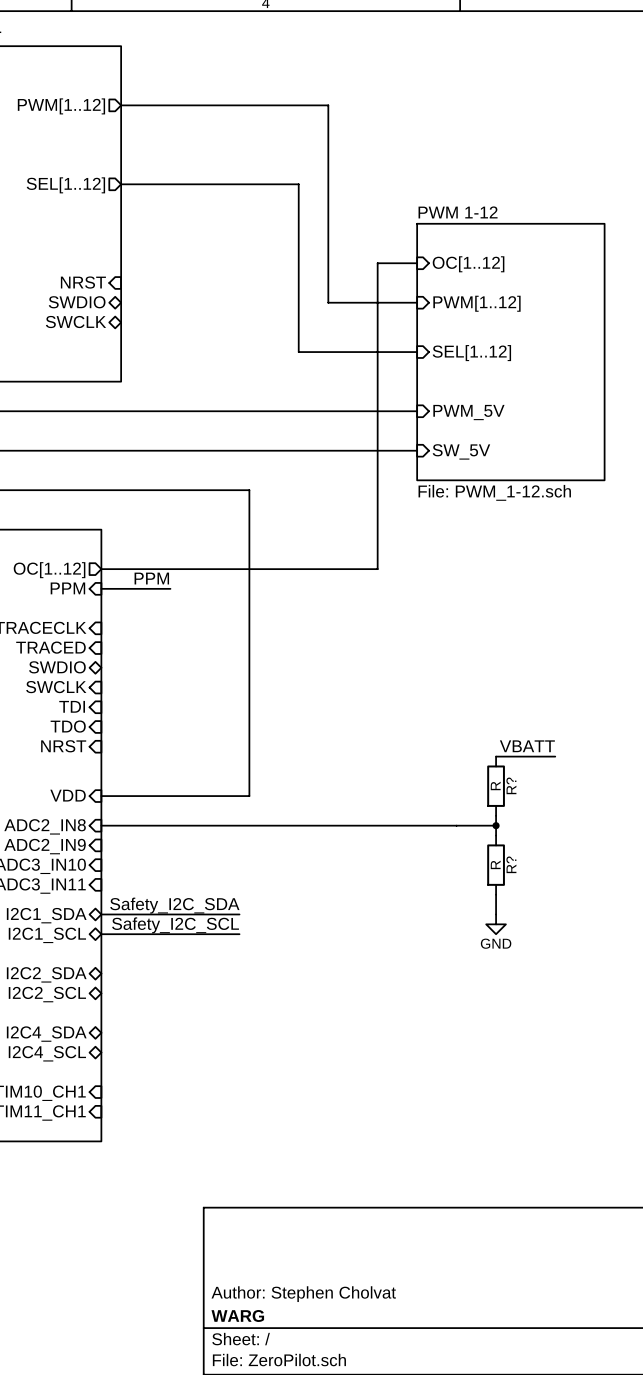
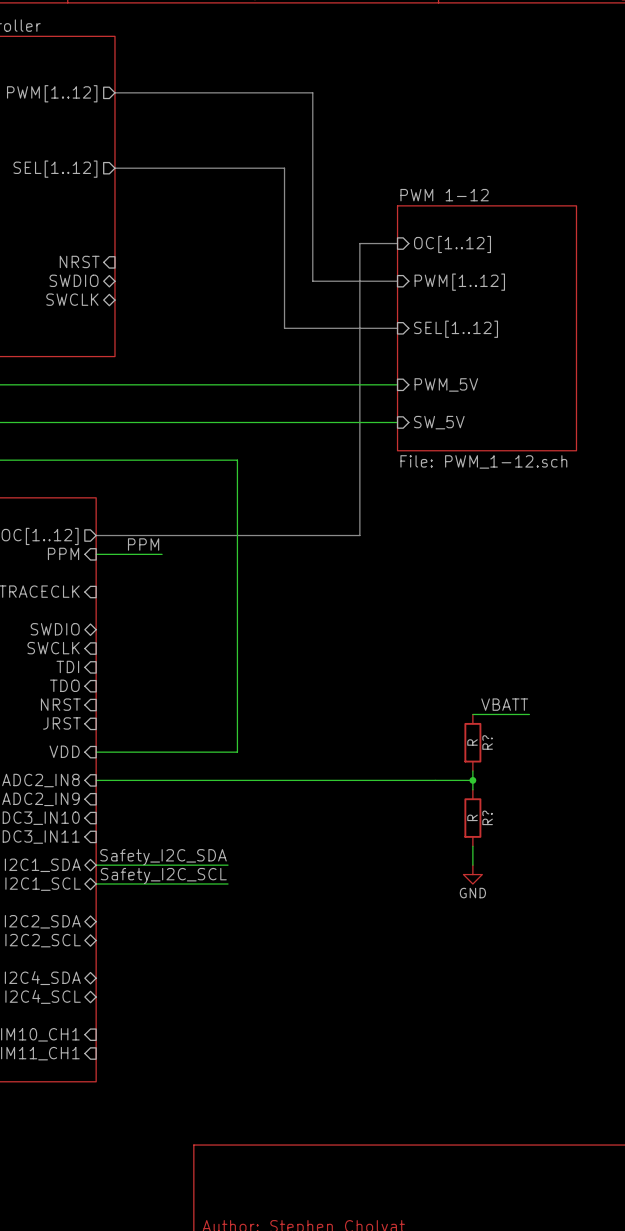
sheet pin: TRACED (50, 647) -> none
sheet pin: none -> JRST (61, 723)

